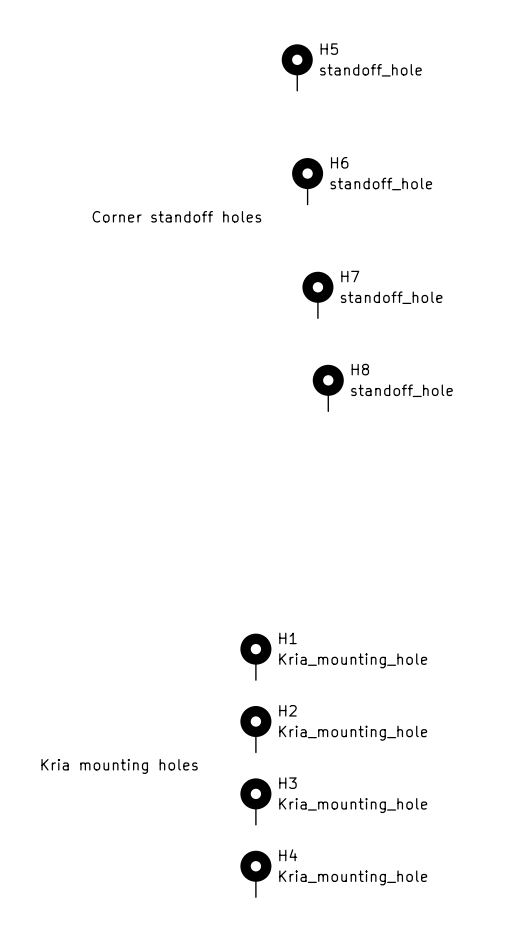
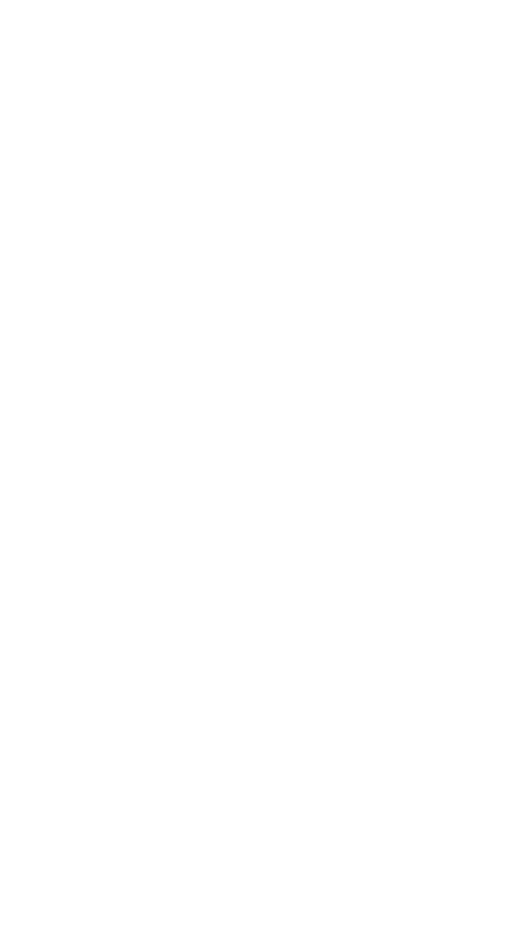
H5: standoff_hole (297, 67) -> none
H6: standoff_hole (307, 181) -> none
text: Corner standoff holes (176, 216) -> none
H7: standoff_hole (317, 295) -> none
H8: standoff_hole (328, 388) -> none
H1: Kria_mounting_hole (255, 656) -> none
H2: Kria_mounting_hole (255, 729) -> none
text: Kria mounting holes (119, 766) -> none
H3: Kria_mounting_hole (255, 801) -> none
H4: Kria_mounting_hole (255, 874) -> none

